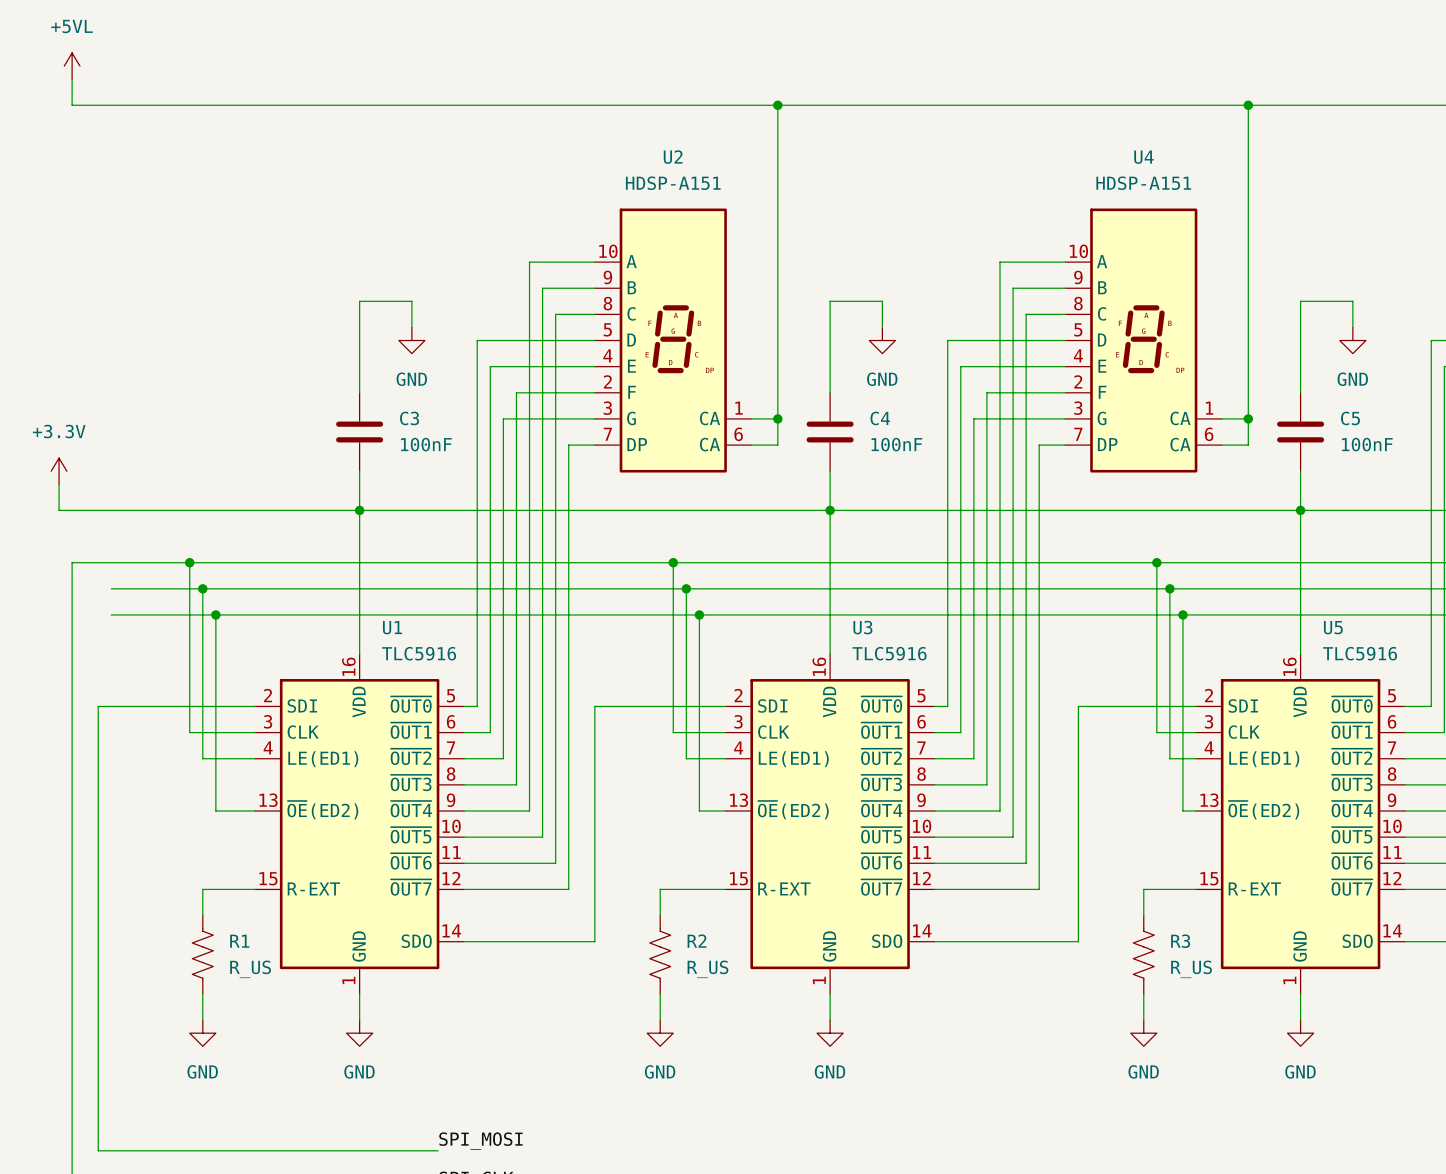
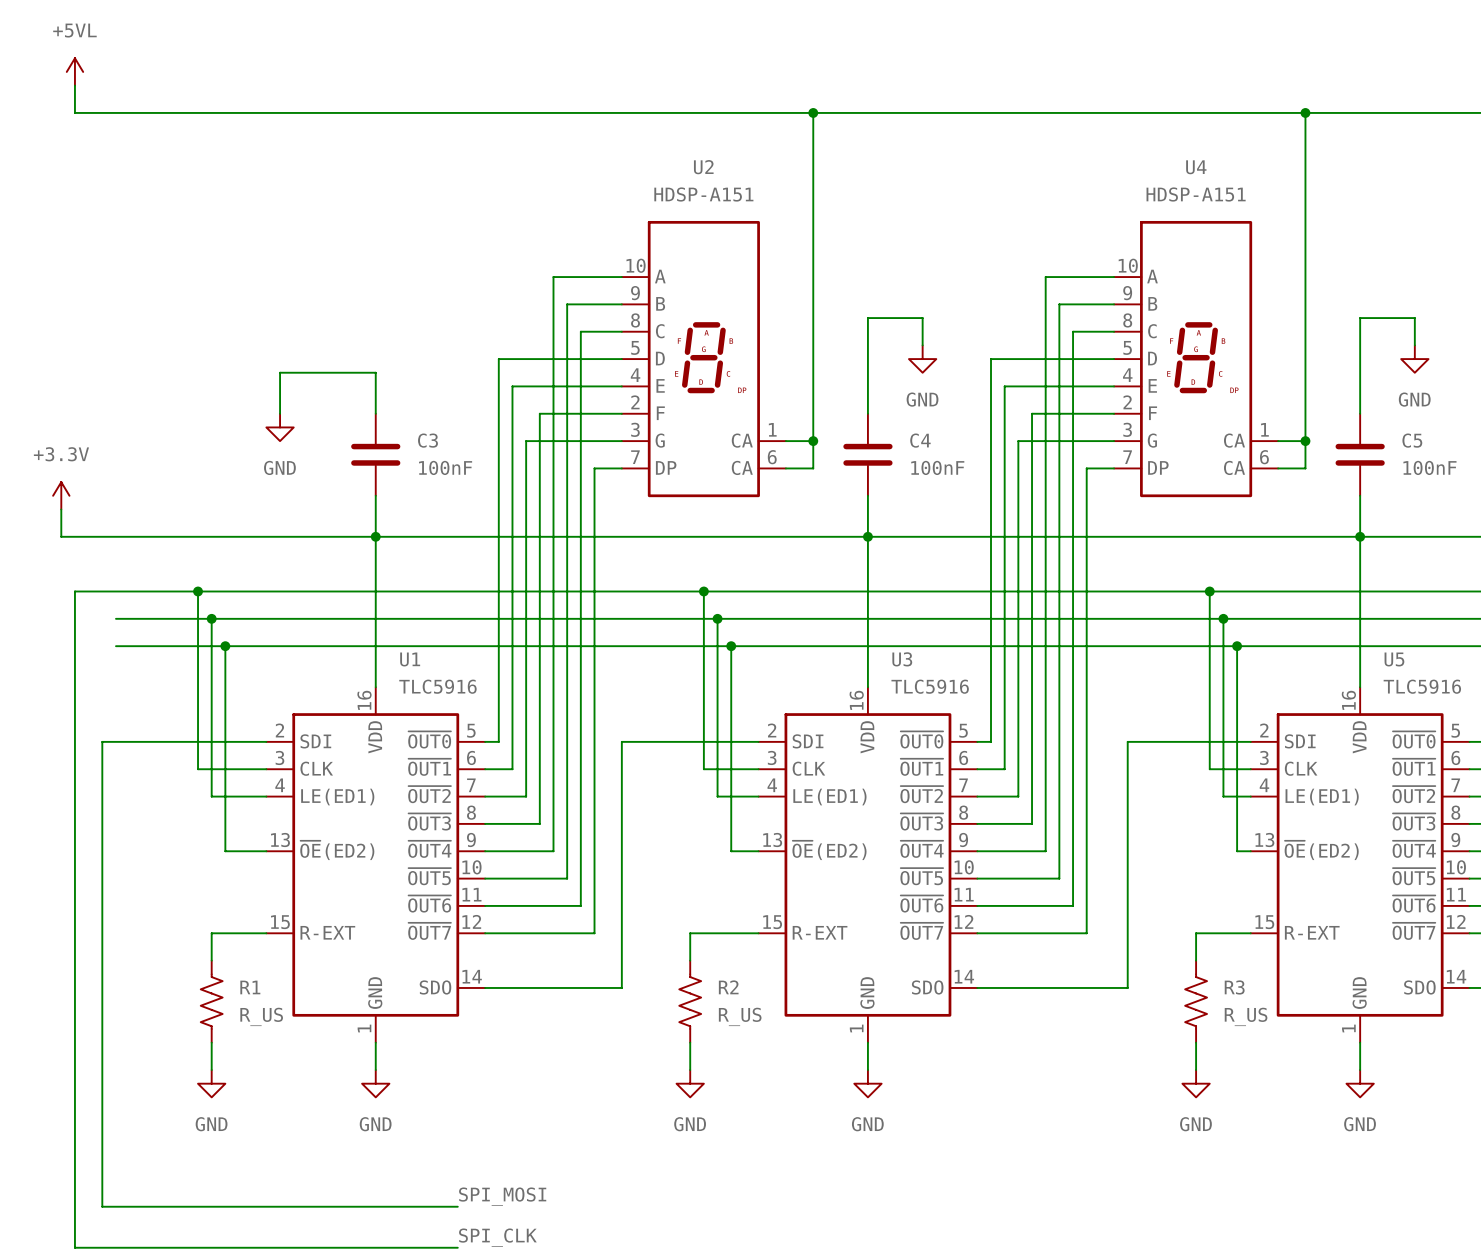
wire: (411, 327) (411, 301) (359, 301) (359, 353) -> (280, 413) (280, 372) (375, 372)
power symbol position: GND (411, 340) -> GND (280, 427)

